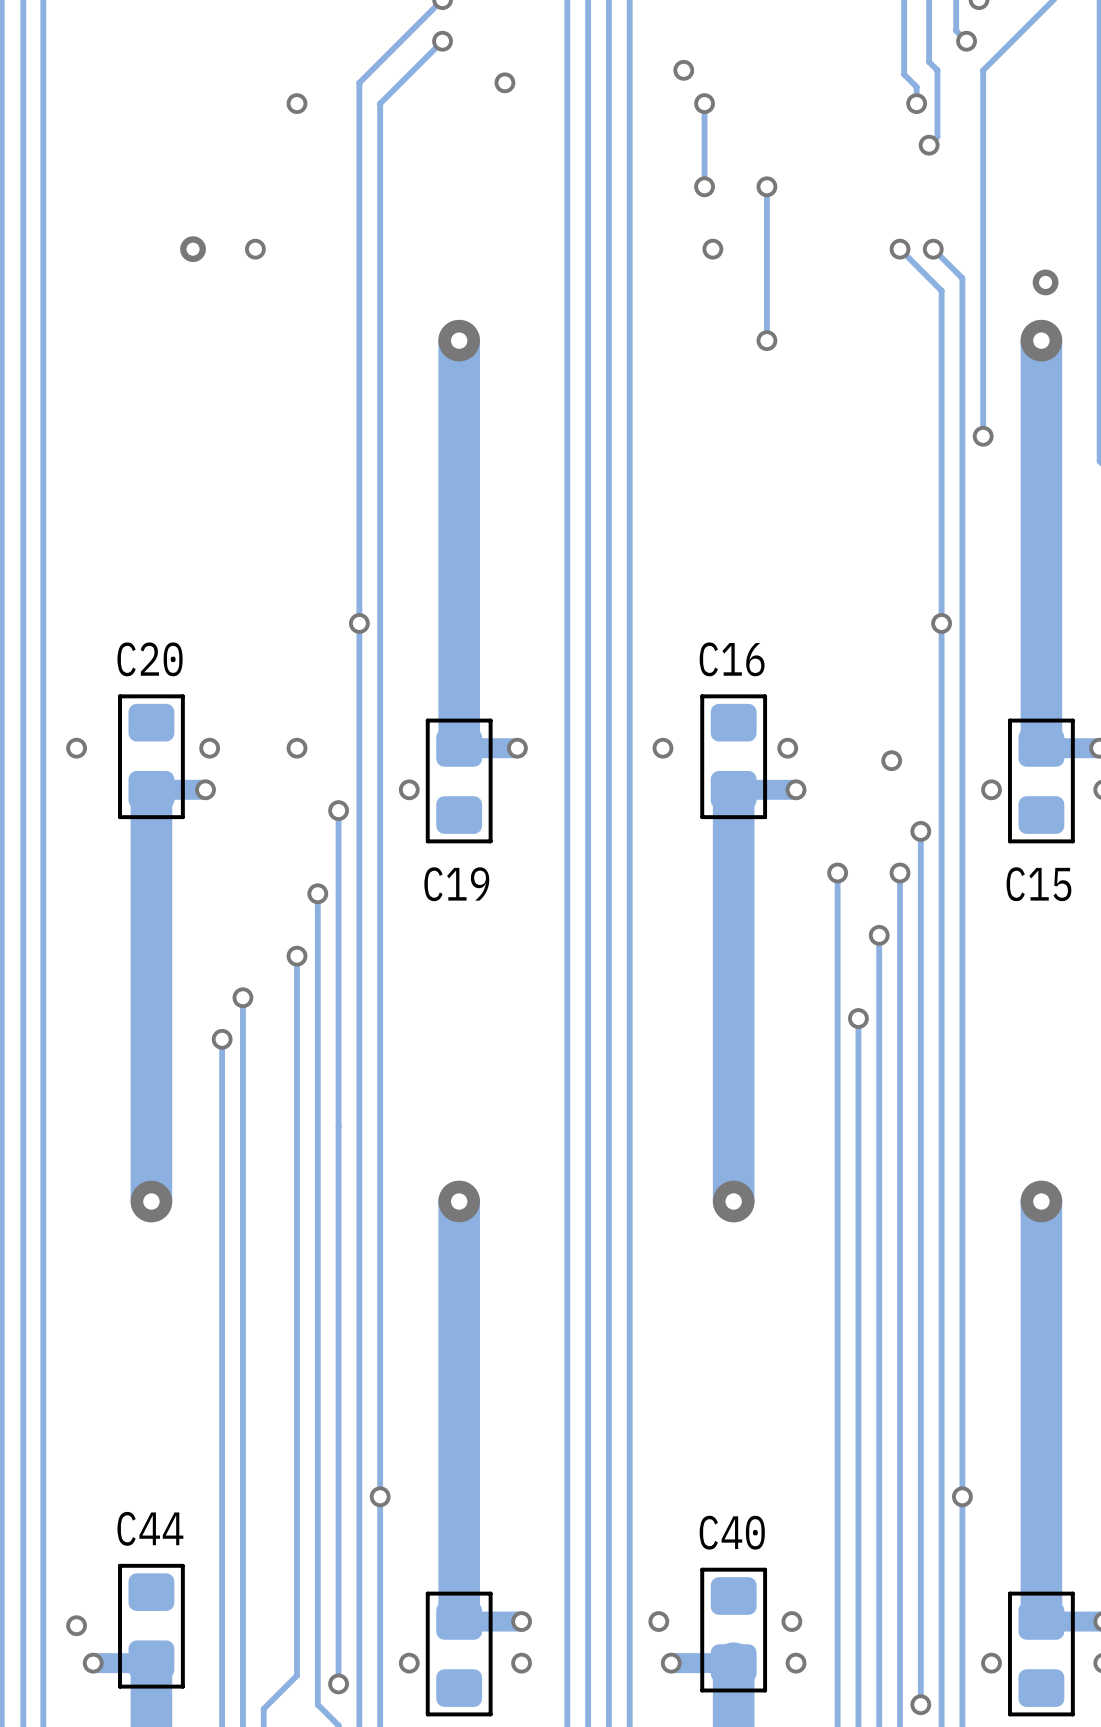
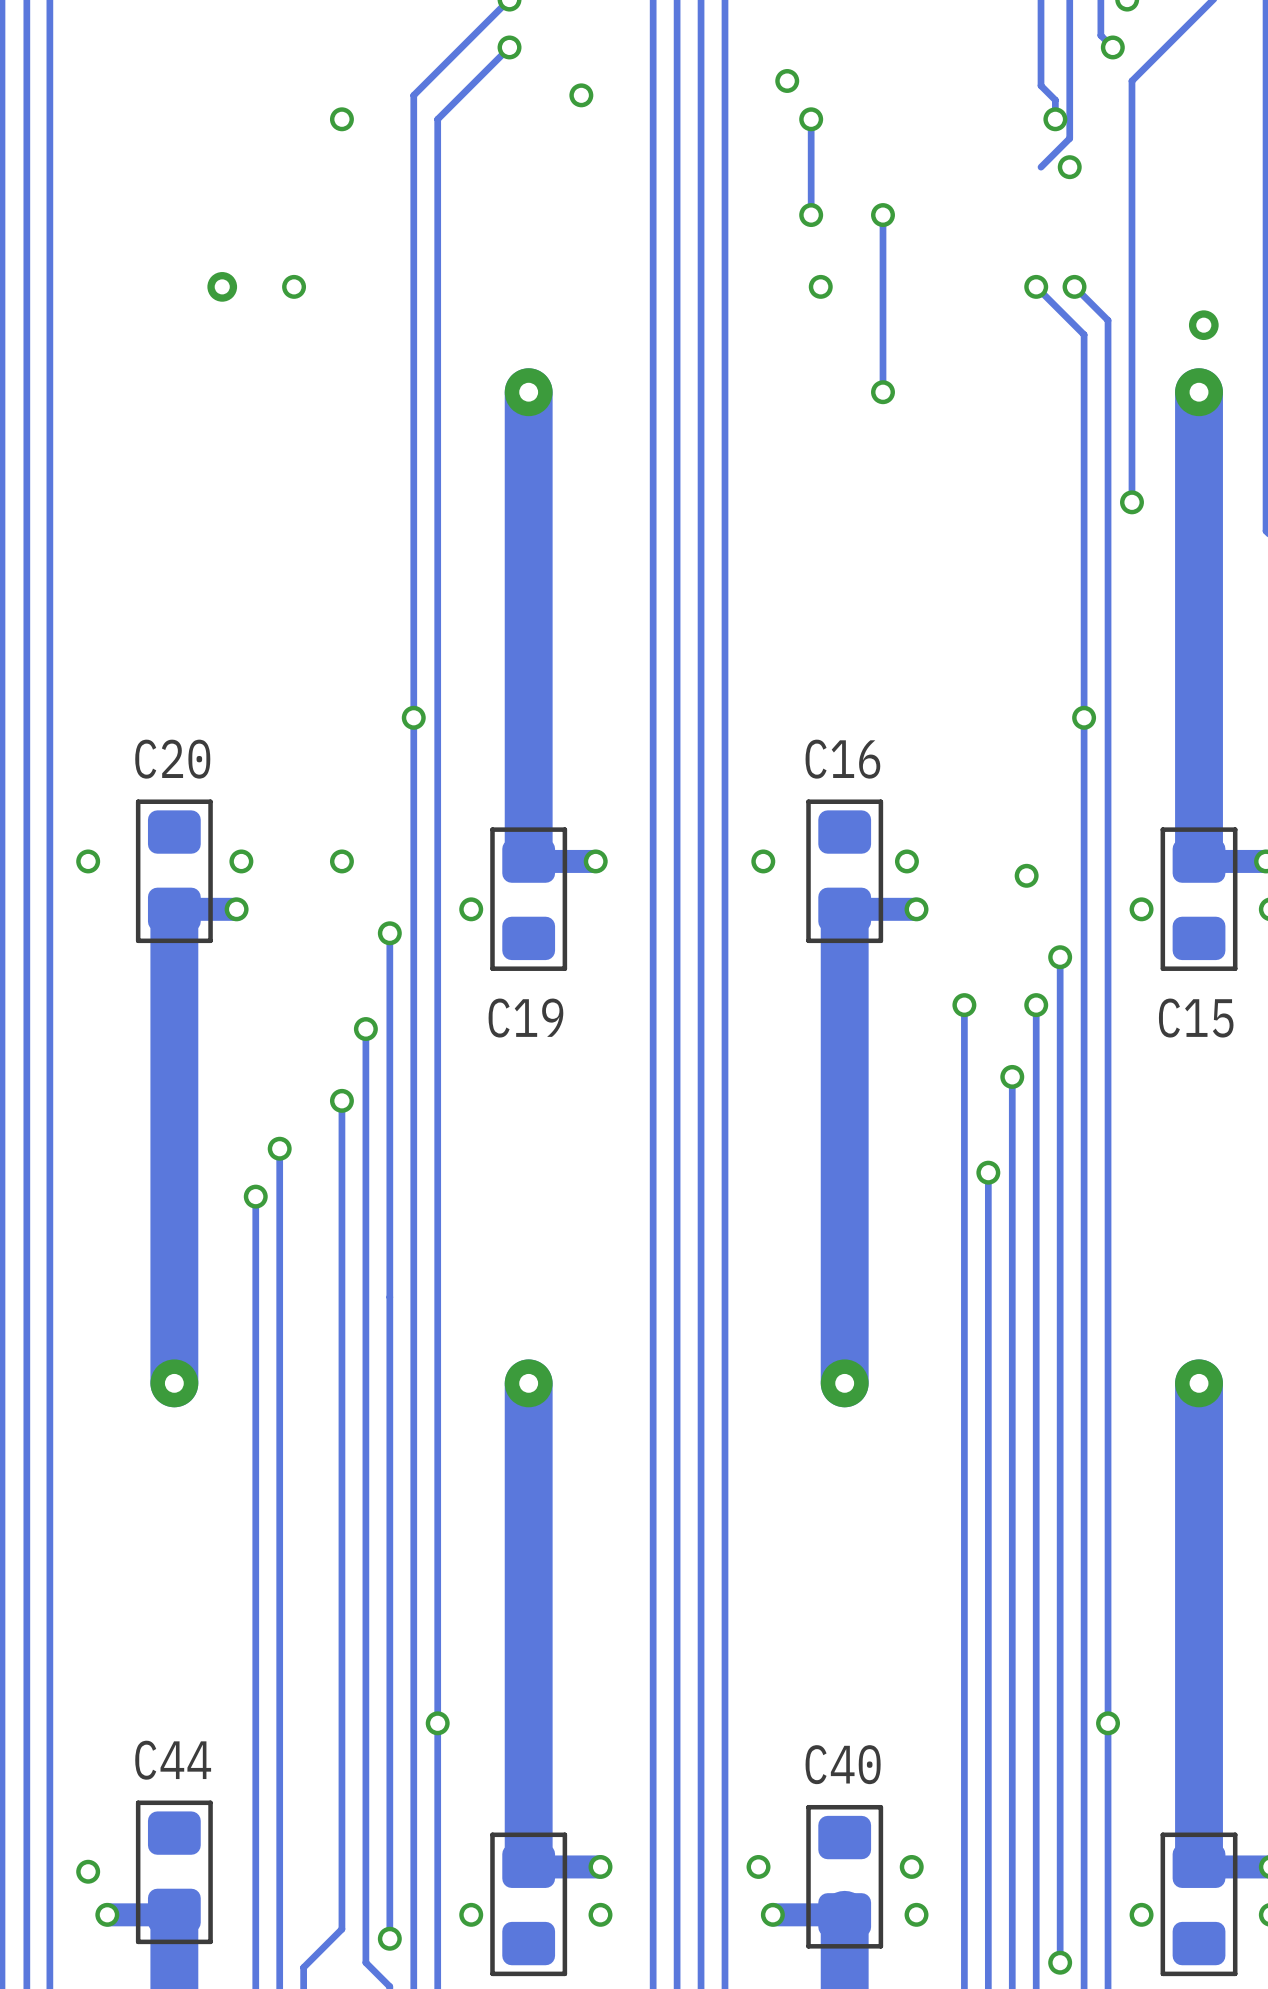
track: (929, 62) (937, 70) (937, 136) (929, 145) -> (1069, 71) (1069, 138) (1041, 167)

